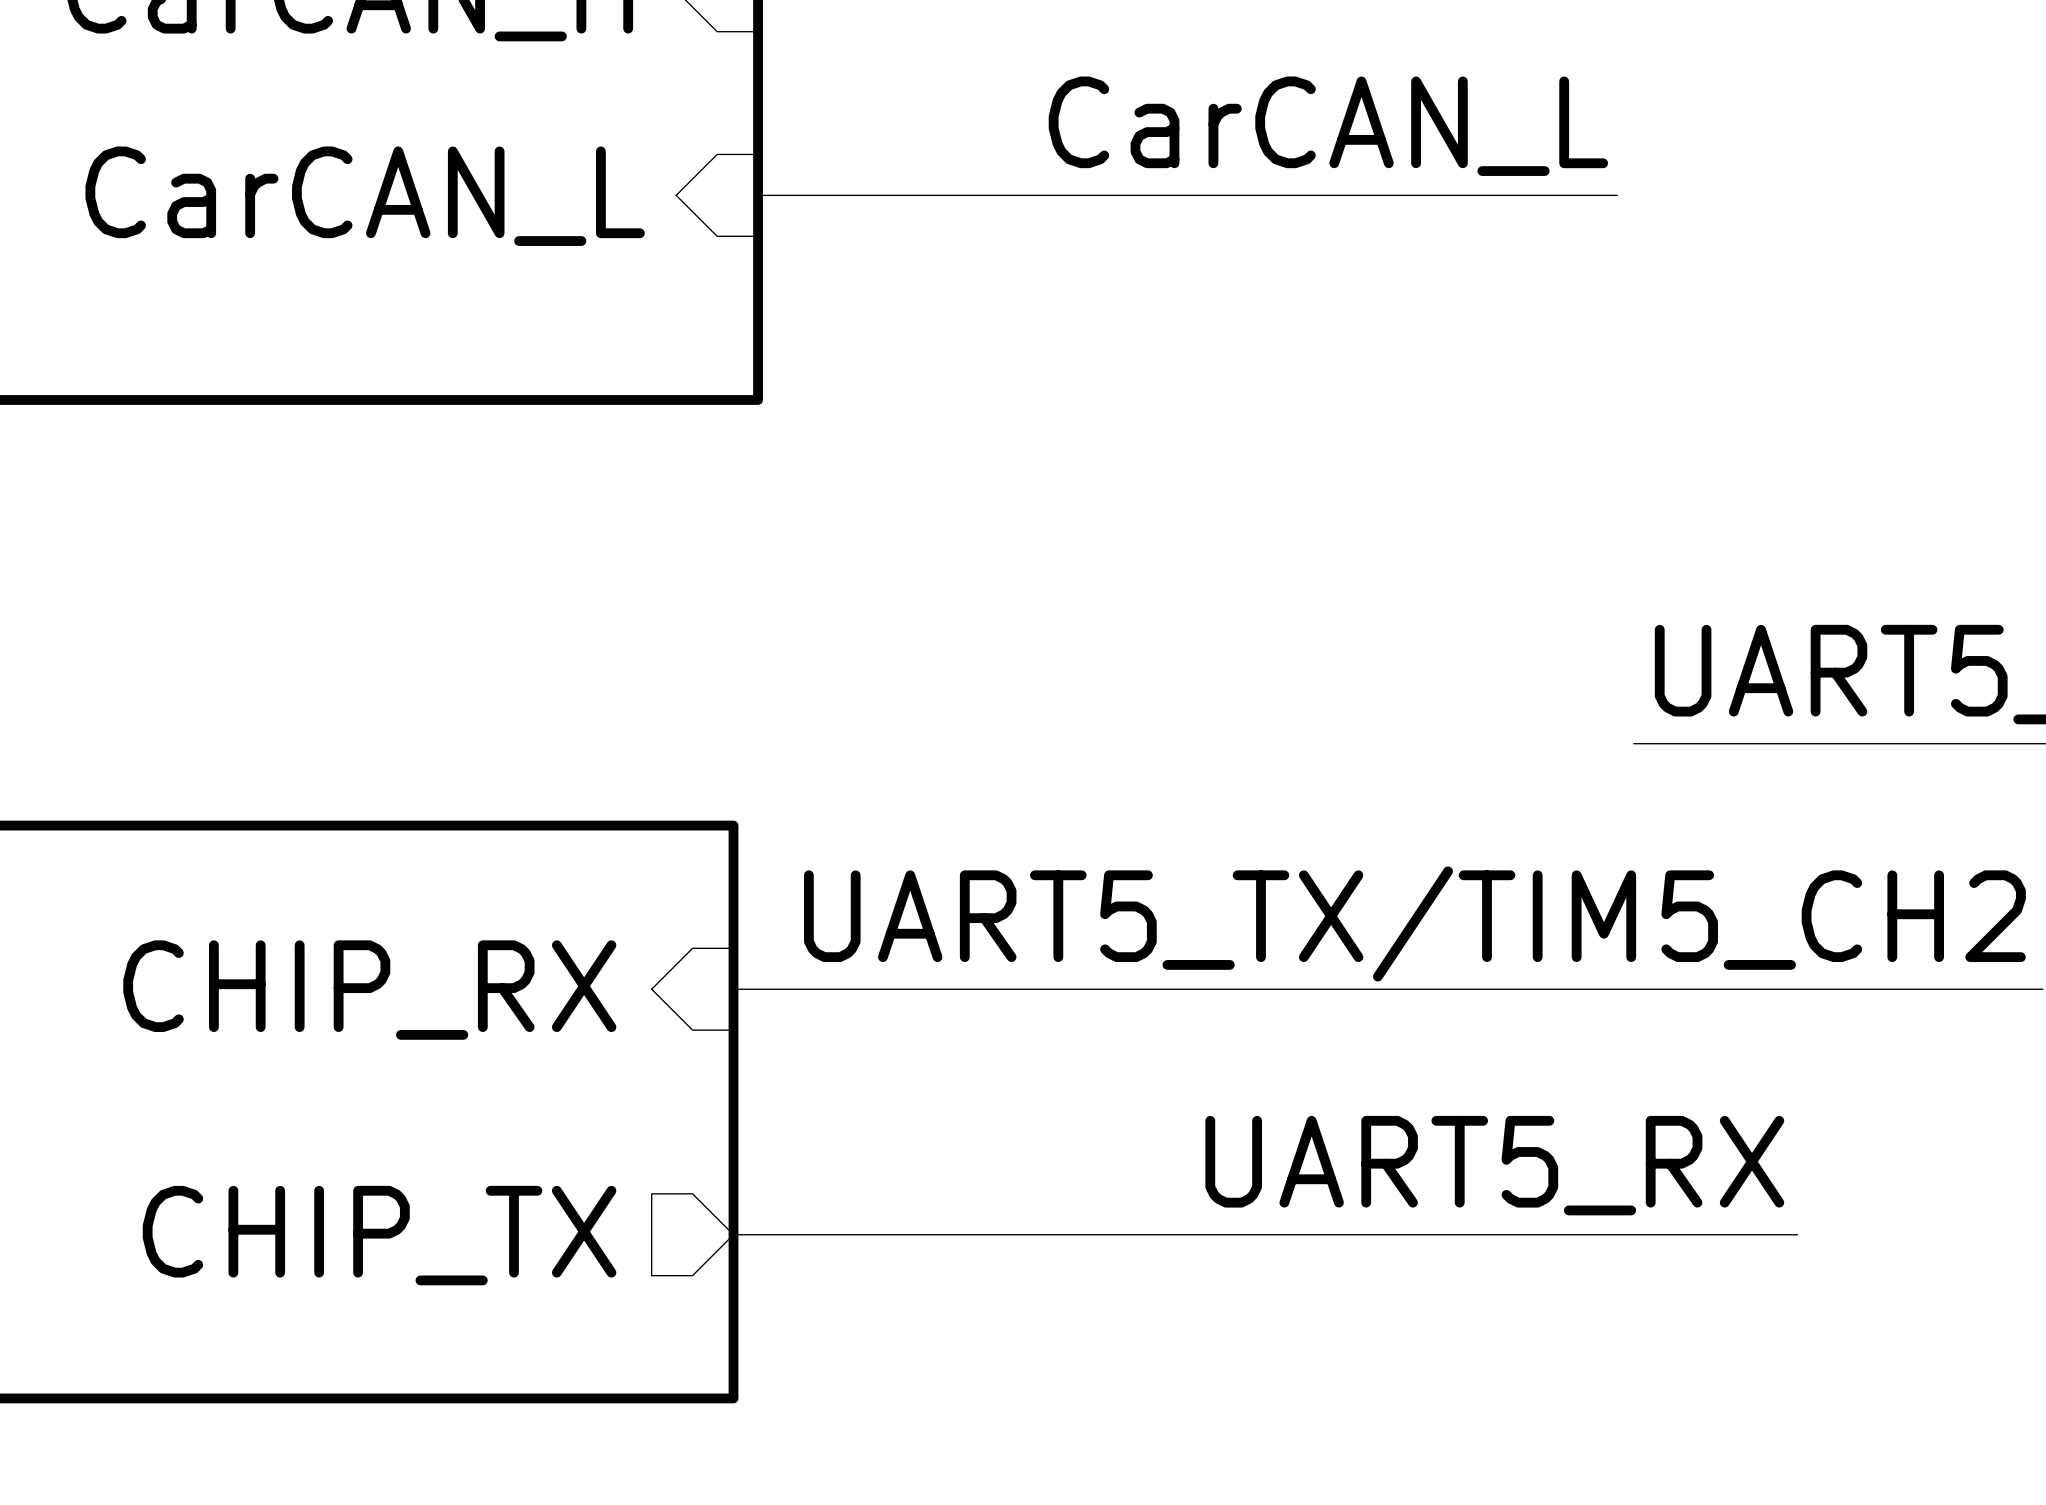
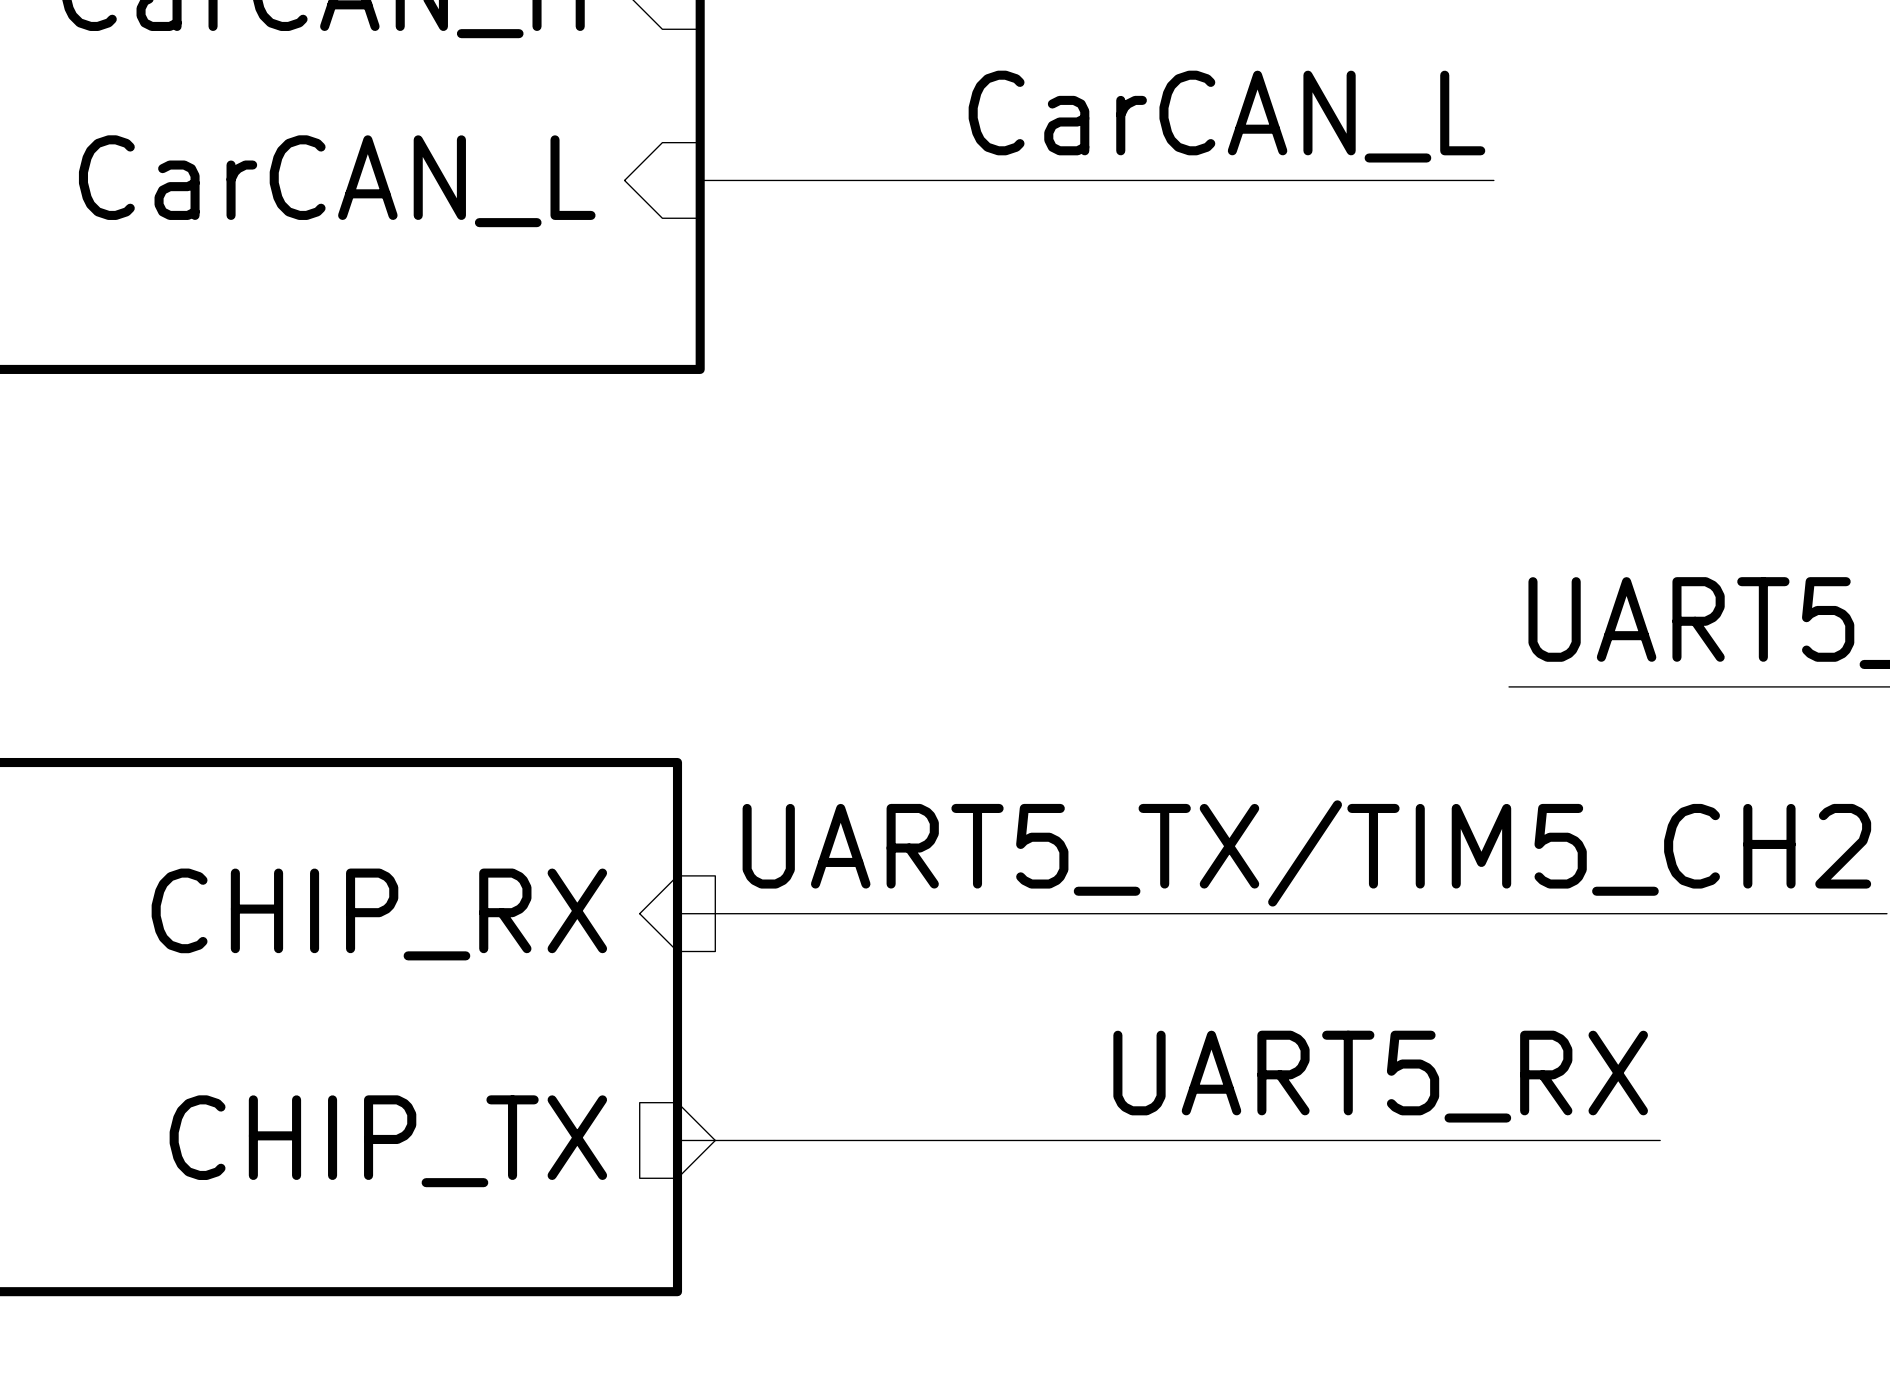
sheet pin position: CHIP_RX (369, 990) -> CHIP_RX (379, 914)
sheet pin position: CHIP_TX (379, 1235) -> CHIP_TX (388, 1141)

